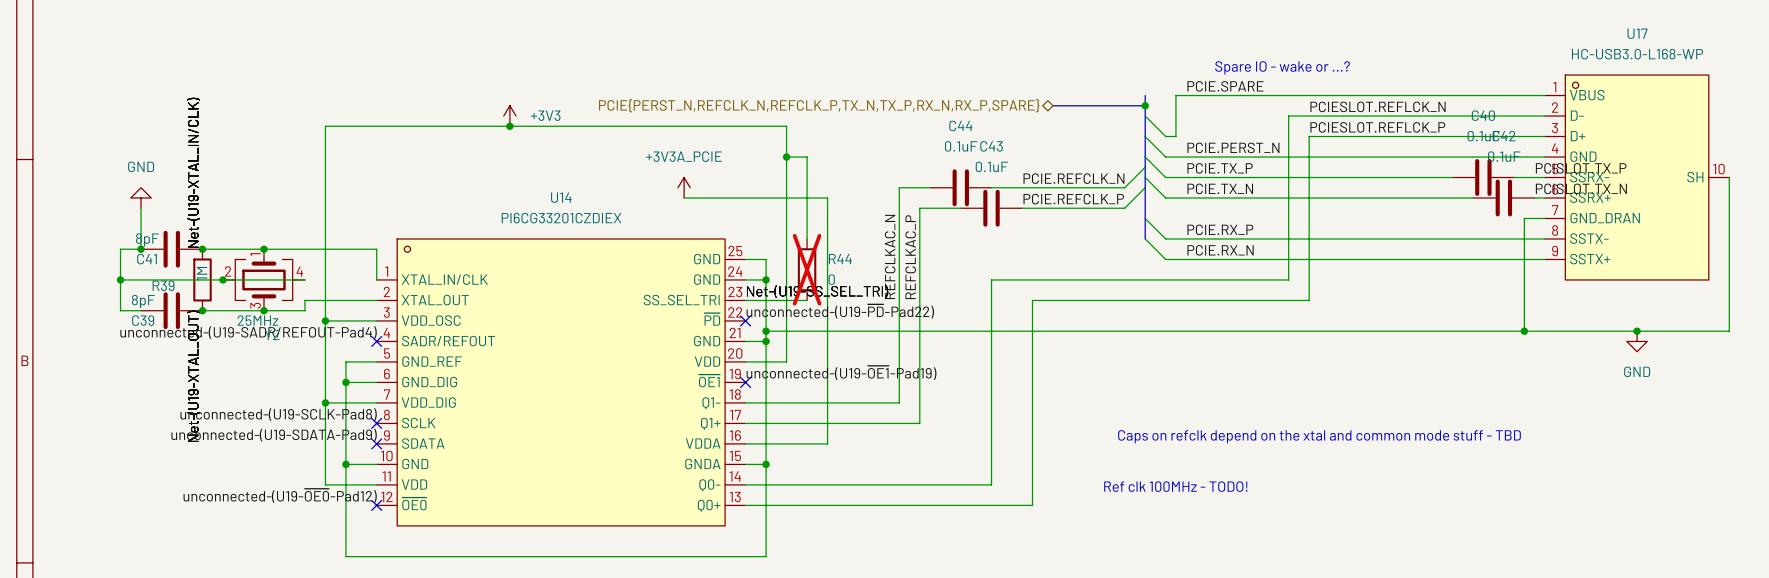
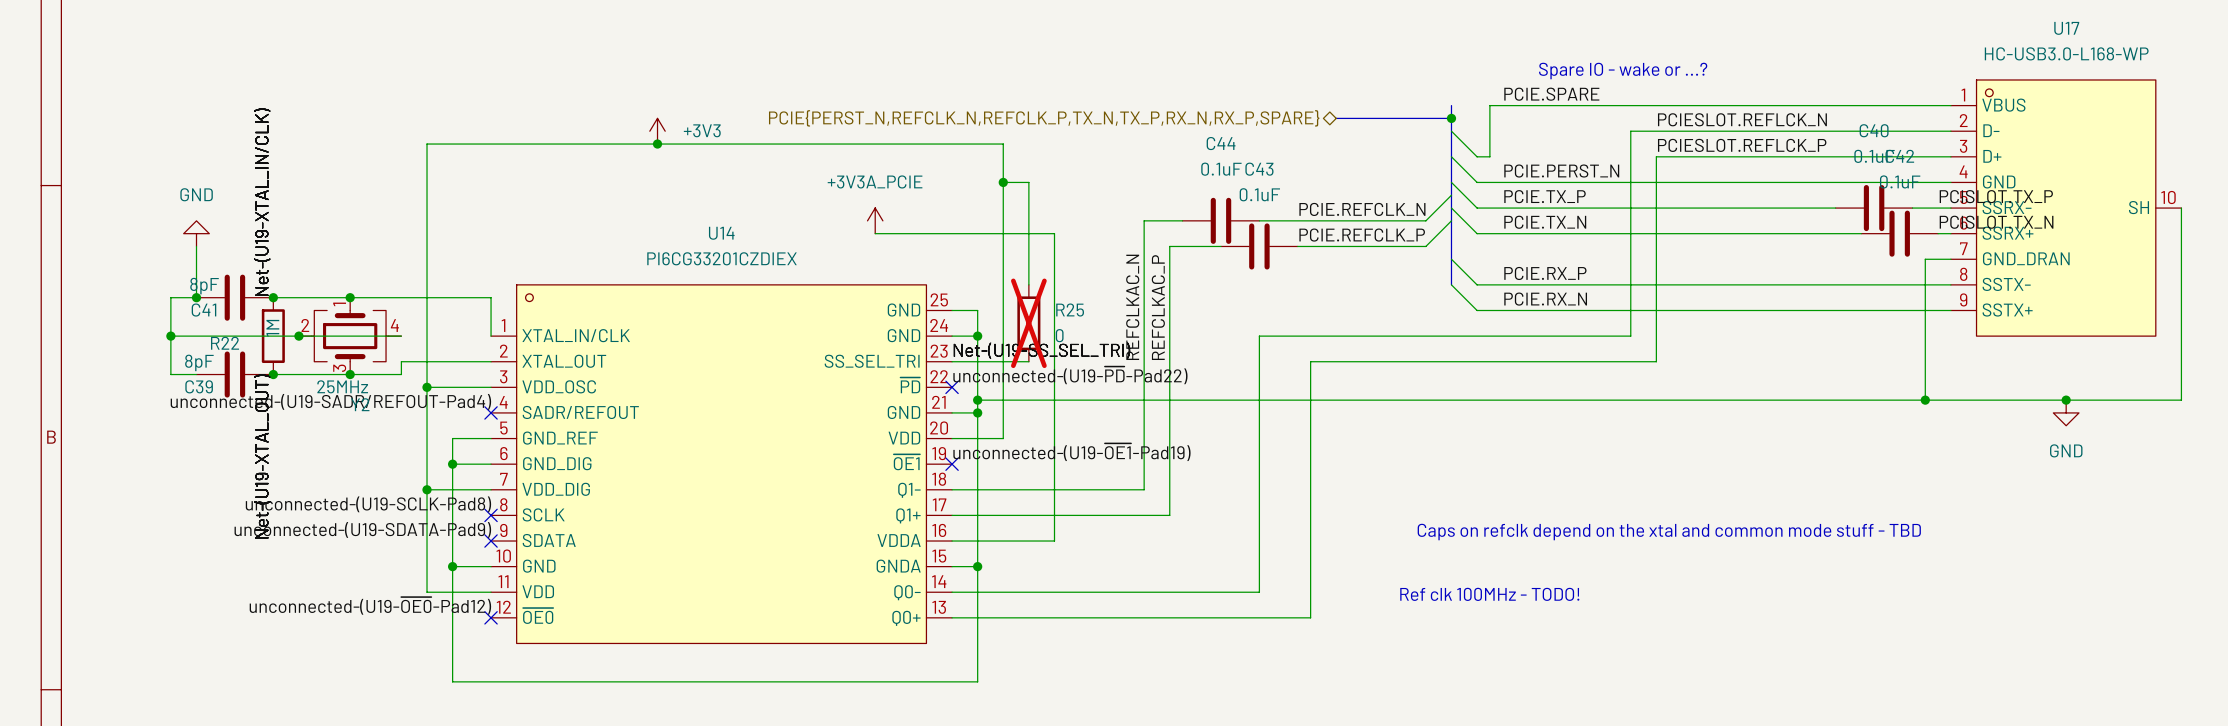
R44 name: R44 (840, 259) -> R25 (1070, 310)
R39 name: R39 (163, 285) -> R22 (225, 343)

